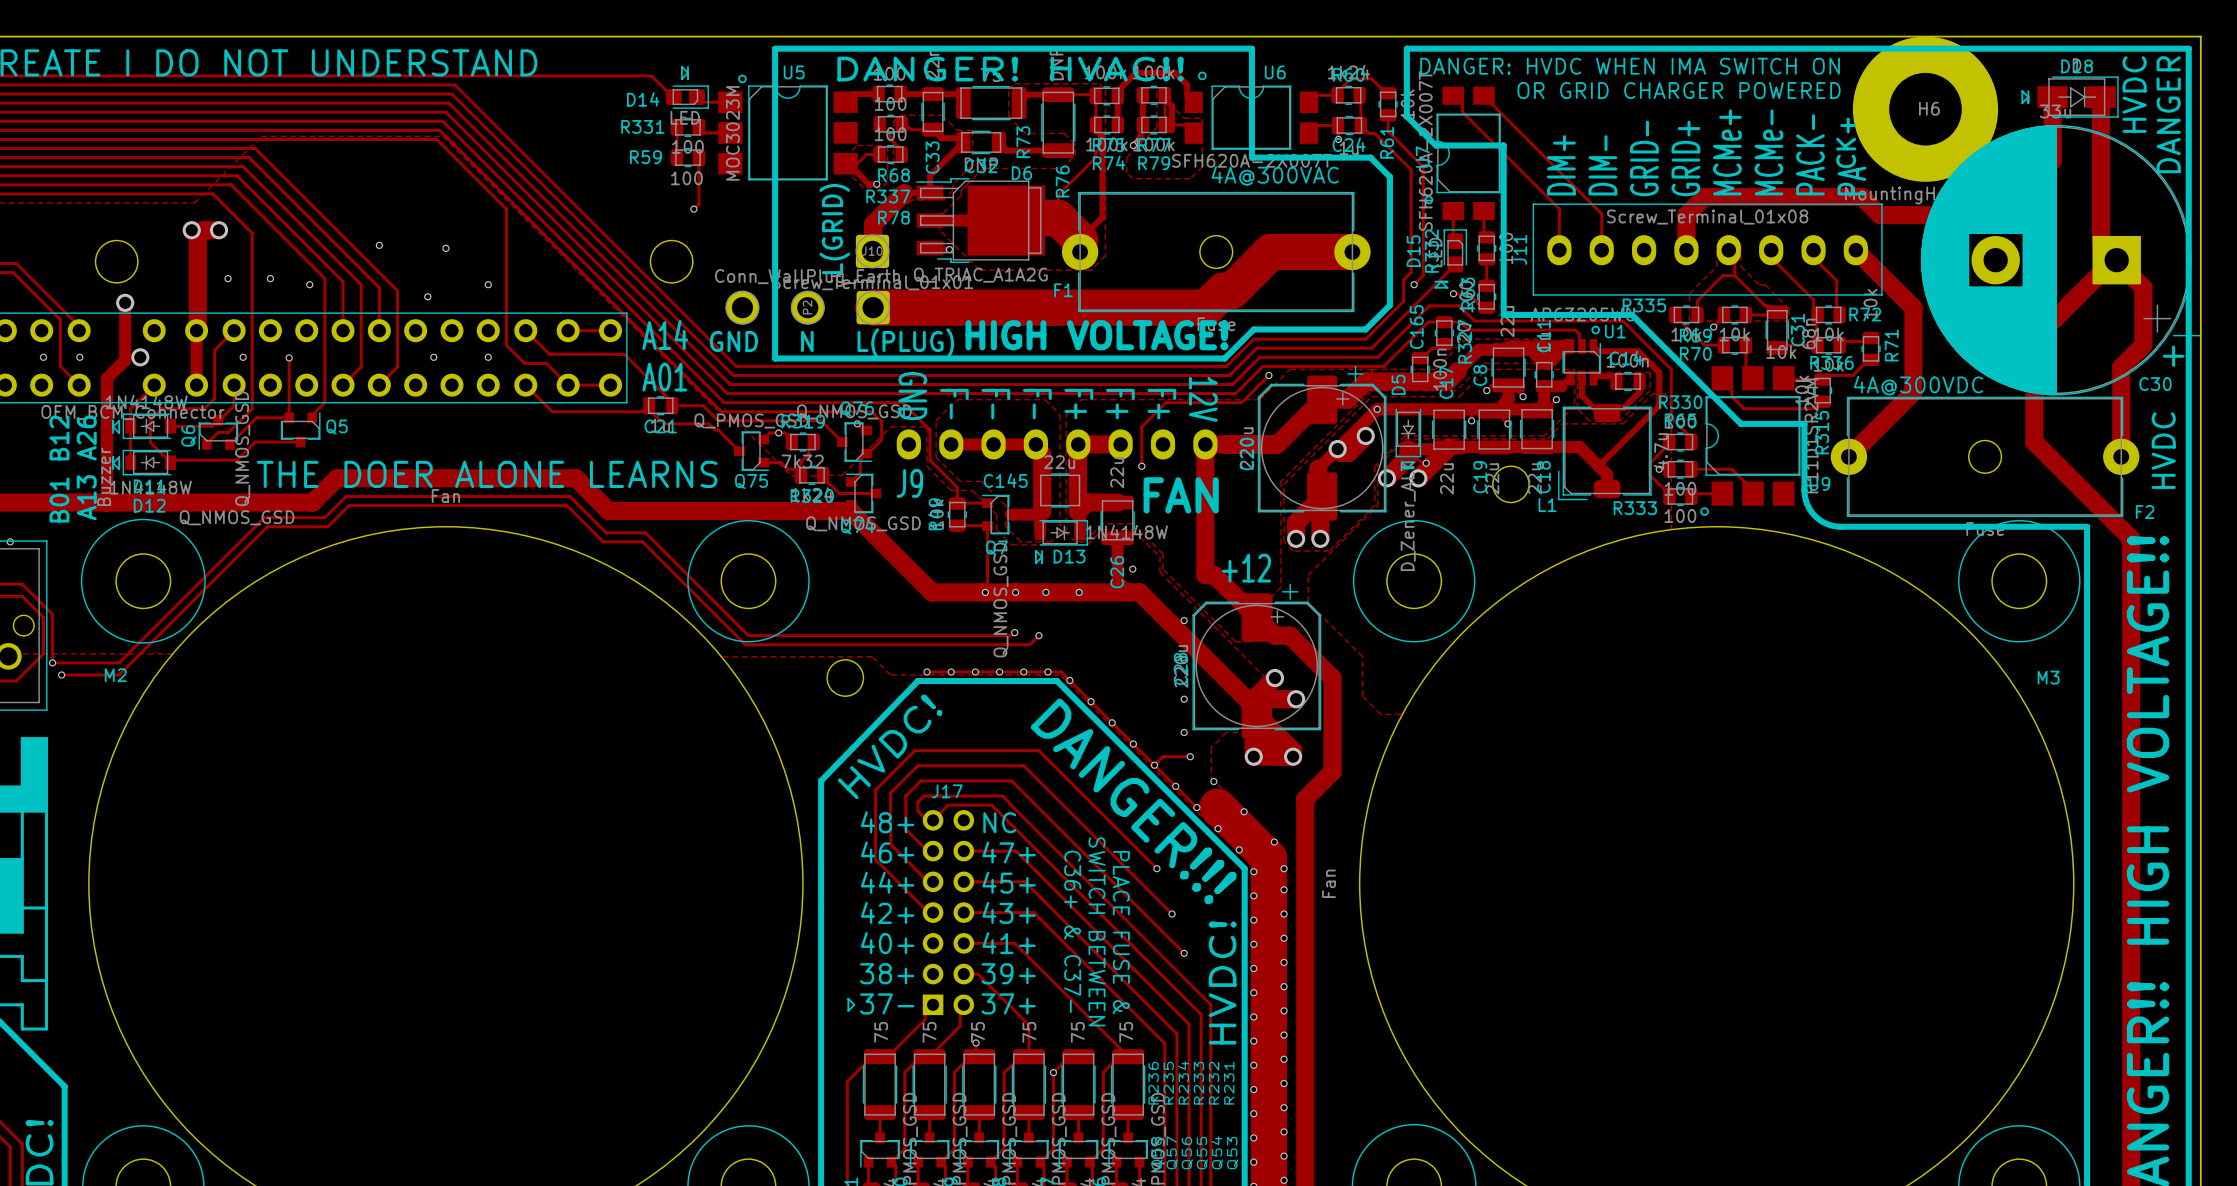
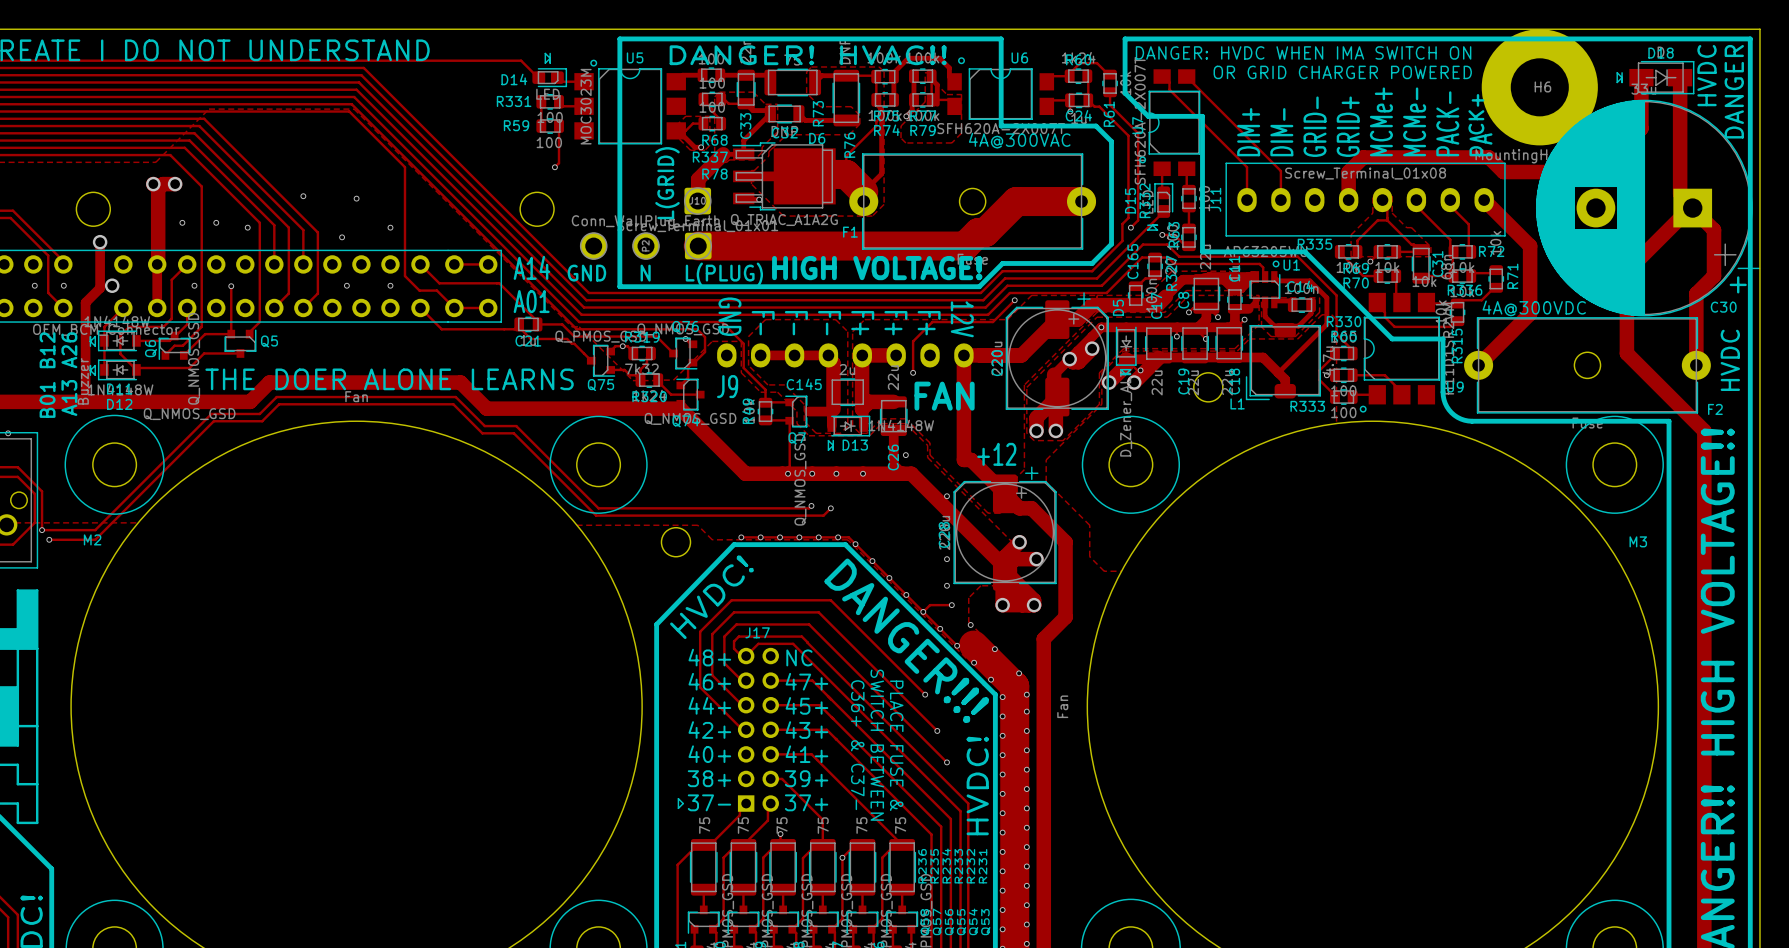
C145 value: 22u (1059, 462) -> 2u (847, 369)

